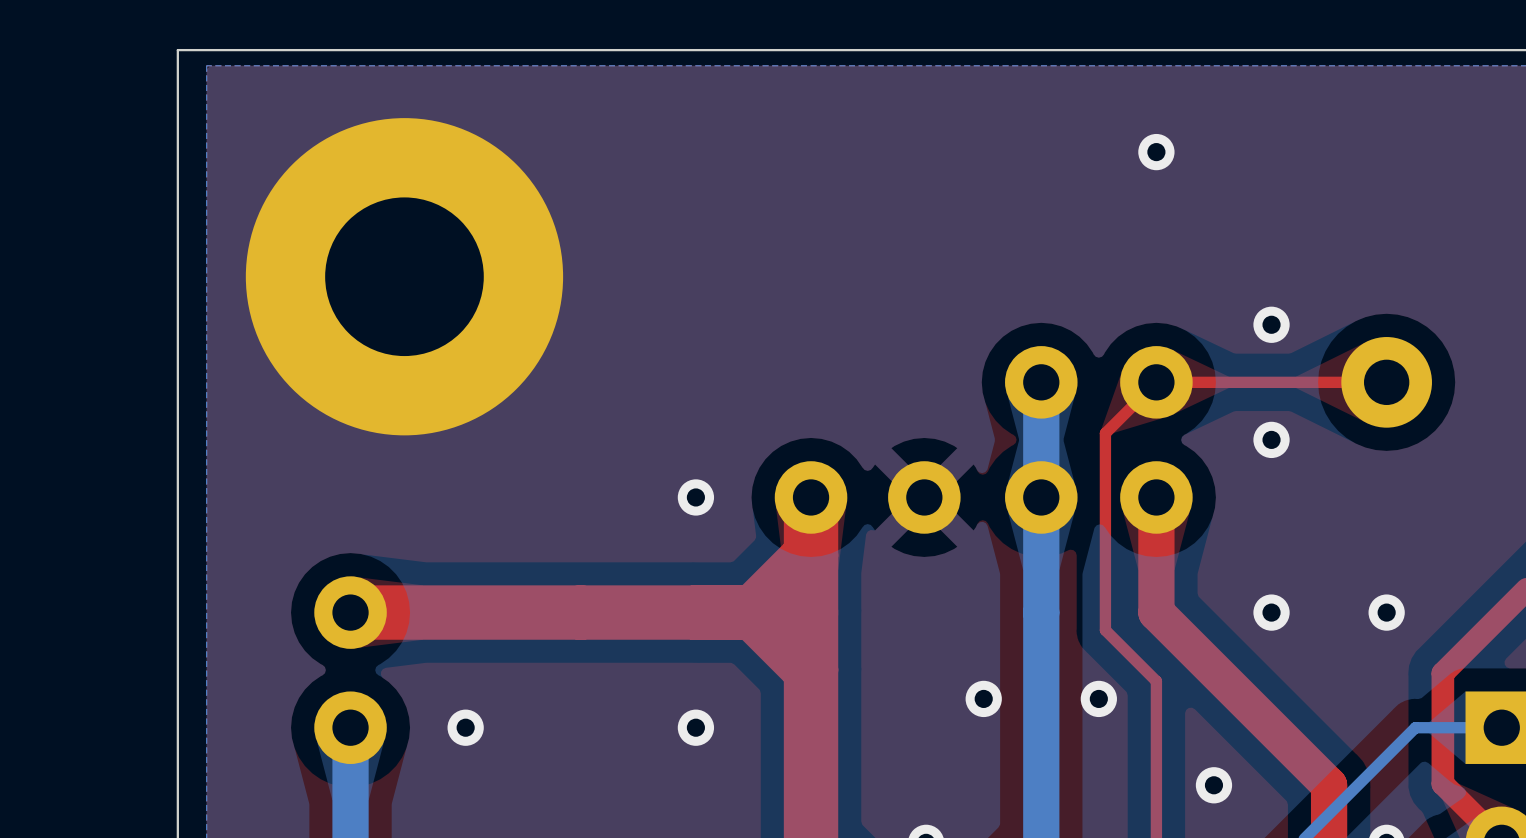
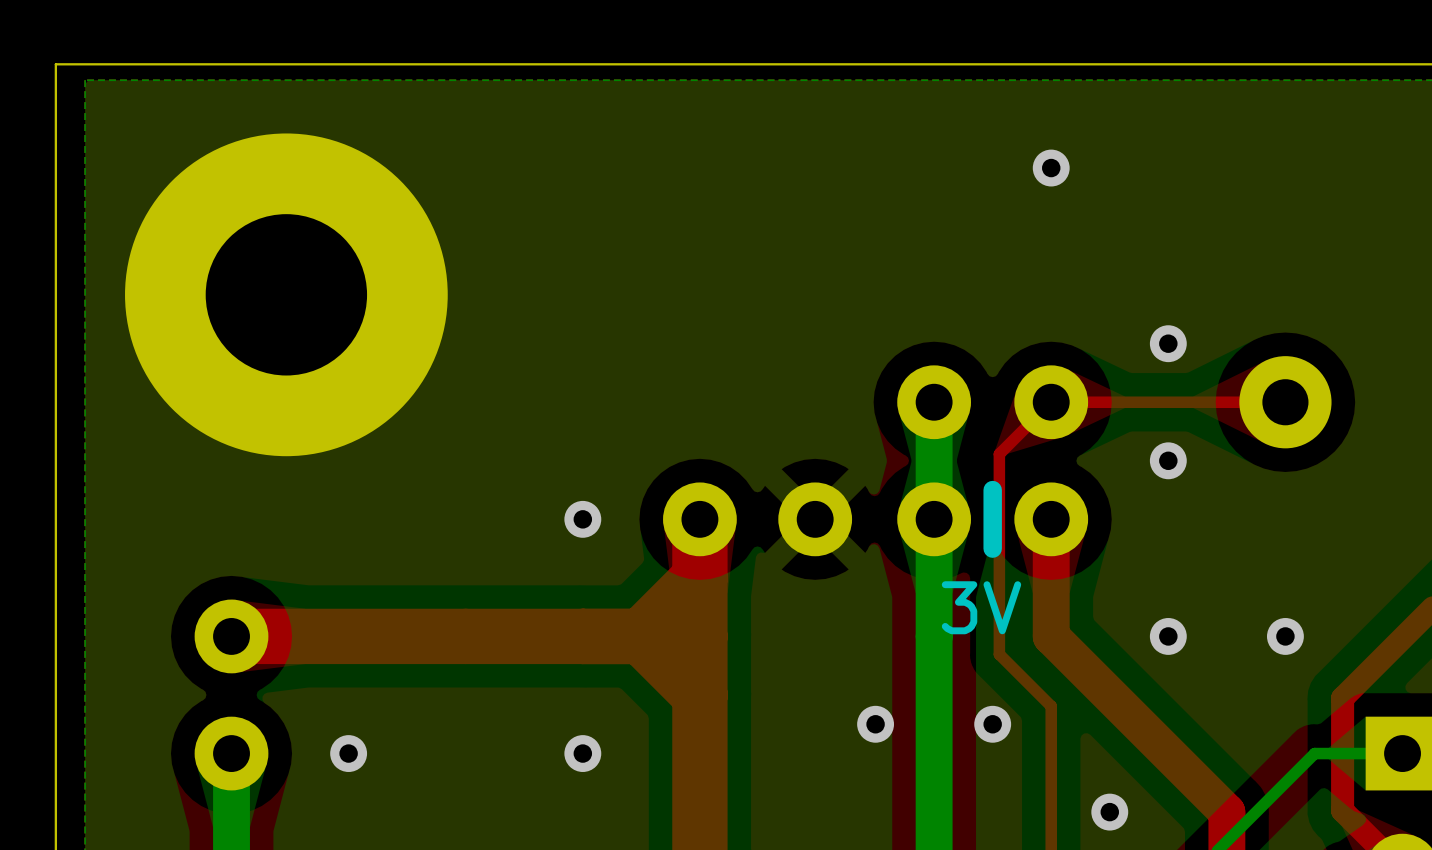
line: none -> (992, 490) (992, 548)
text: none -> 3V (981, 607)

